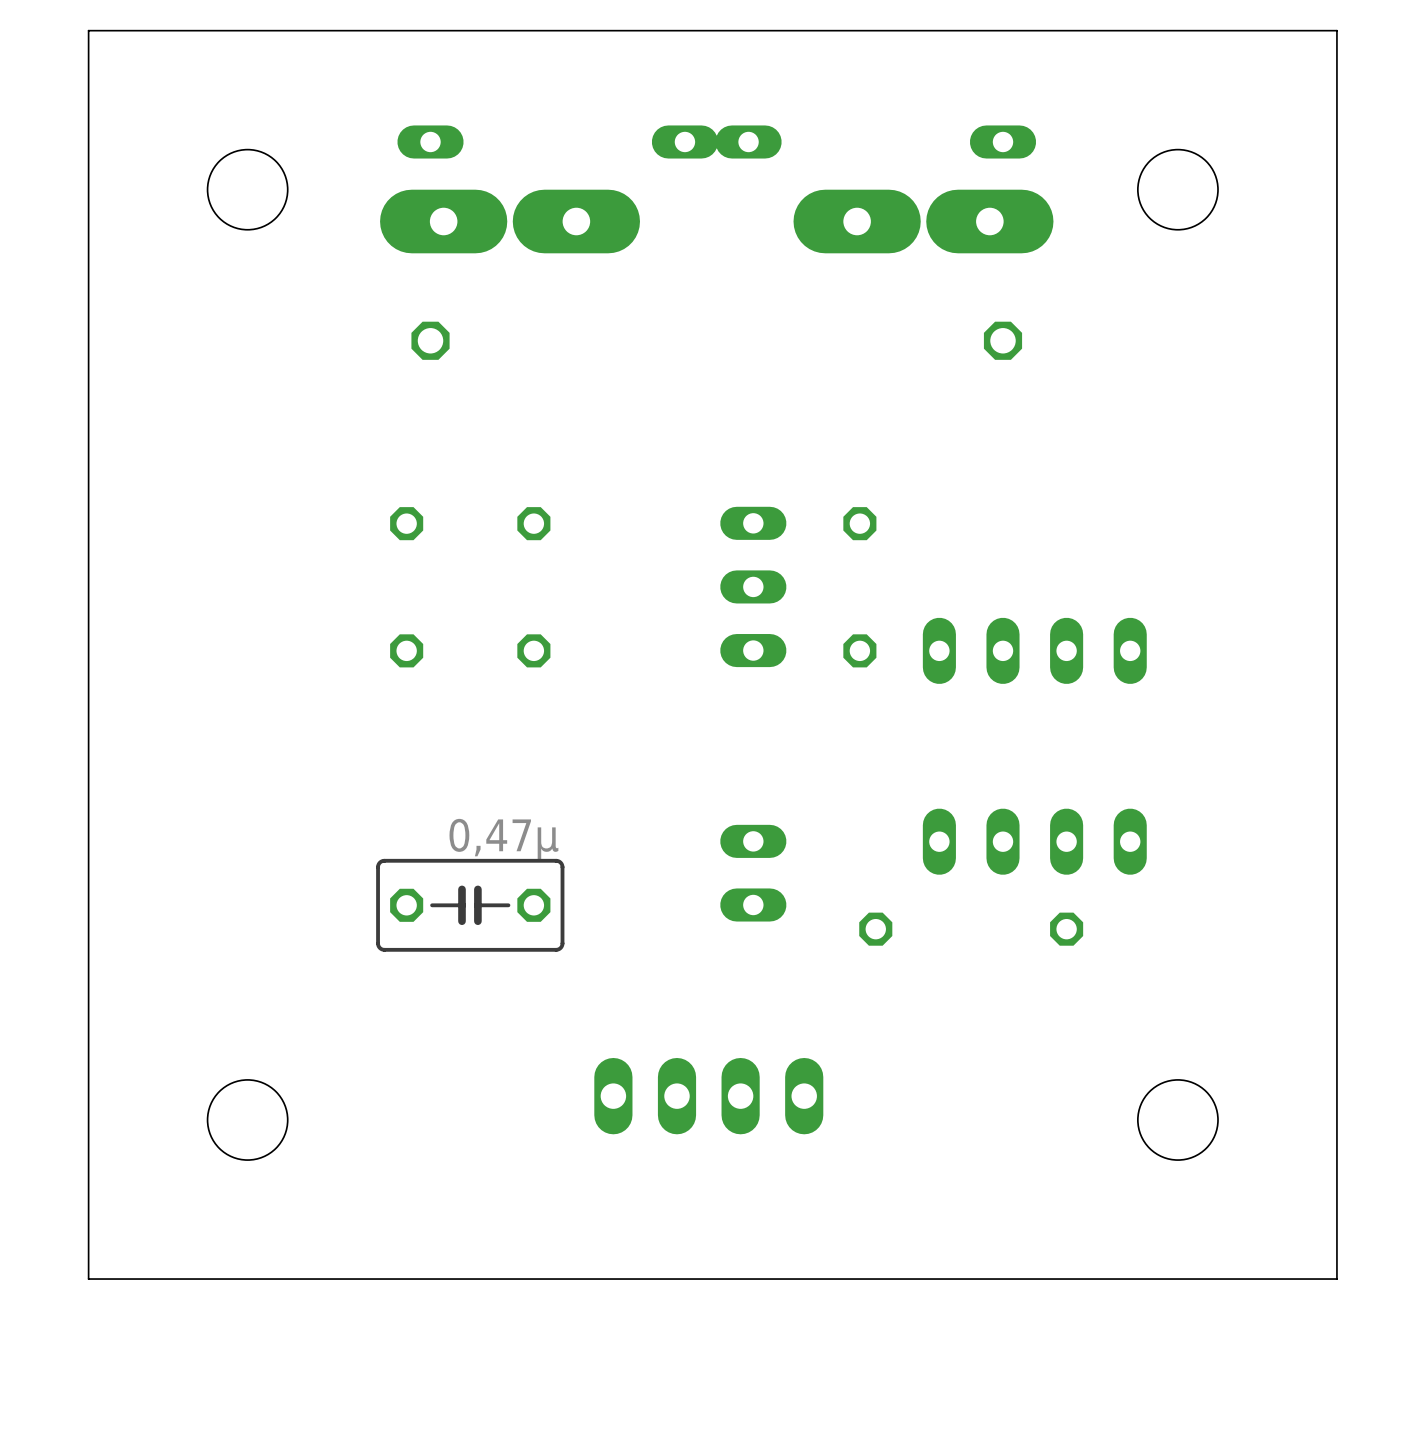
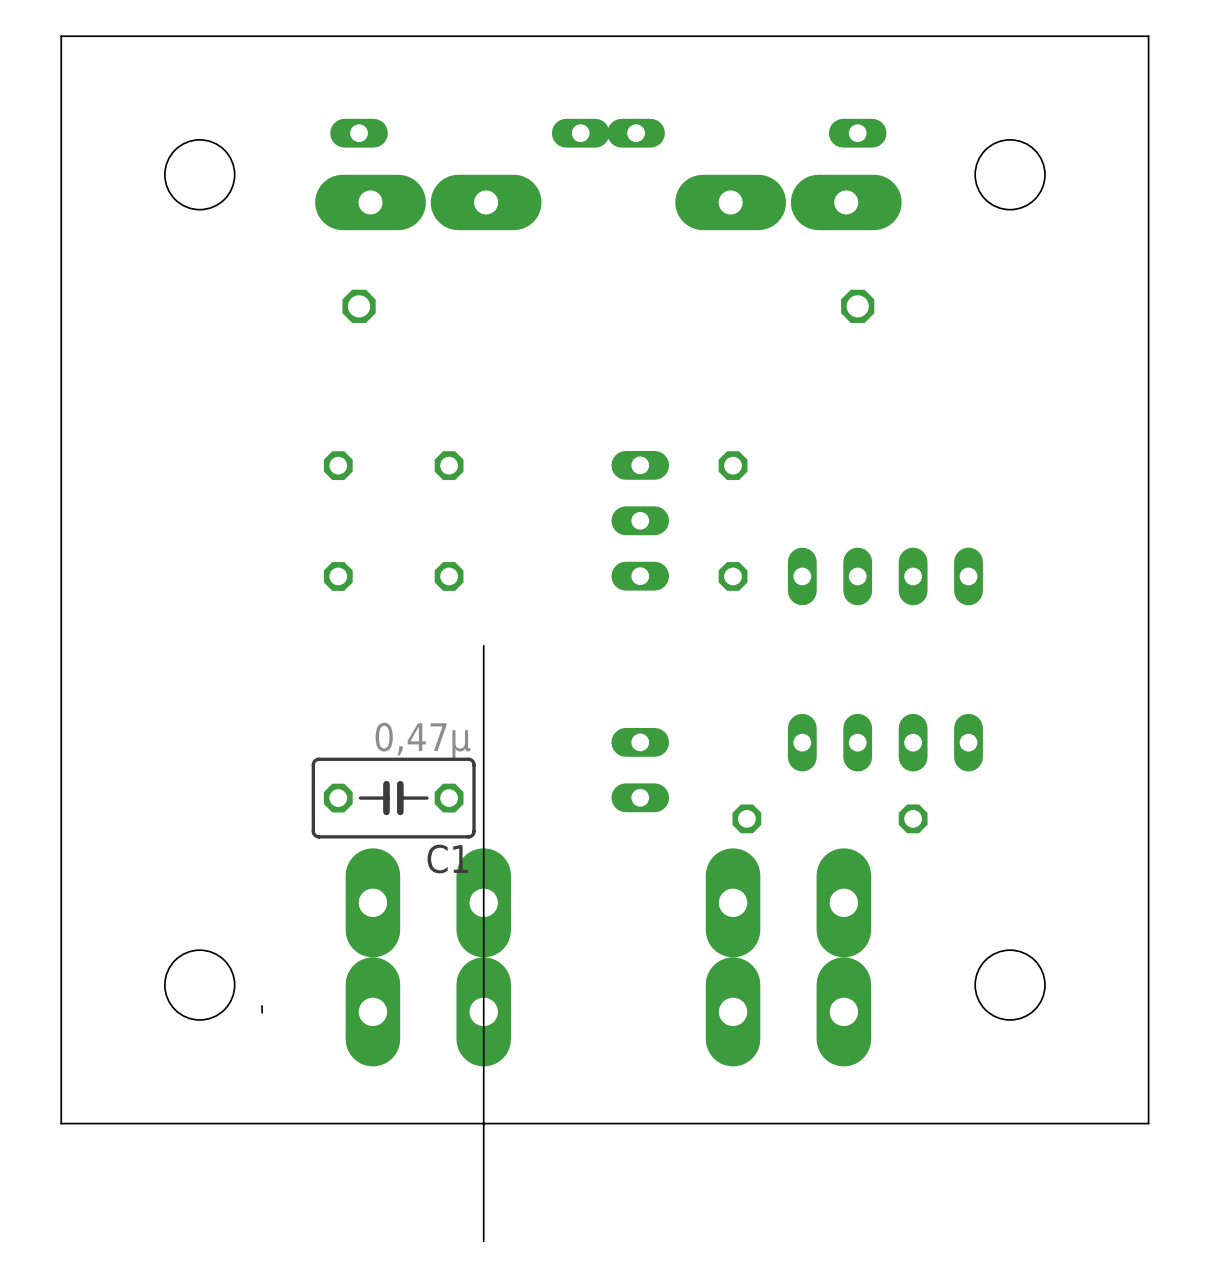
board edge: none -> (483, 645) (483, 1241)
C1 name: none -> C1 (447, 859)
part: none -> (372, 957)
part: none -> (483, 957)
part: none -> (733, 957)
part: none -> (843, 957)
part: (708, 1096) -> none
board edge: none -> (262, 1005) (262, 1012)

